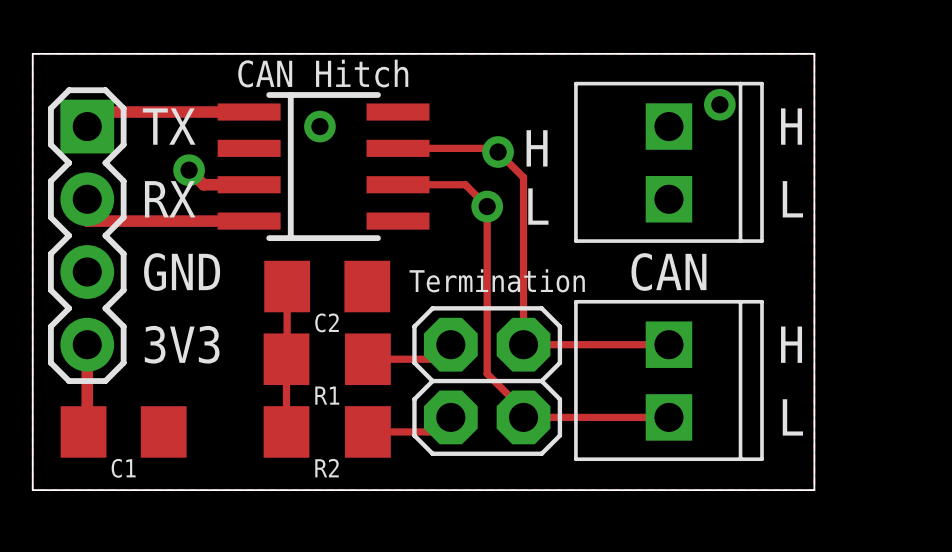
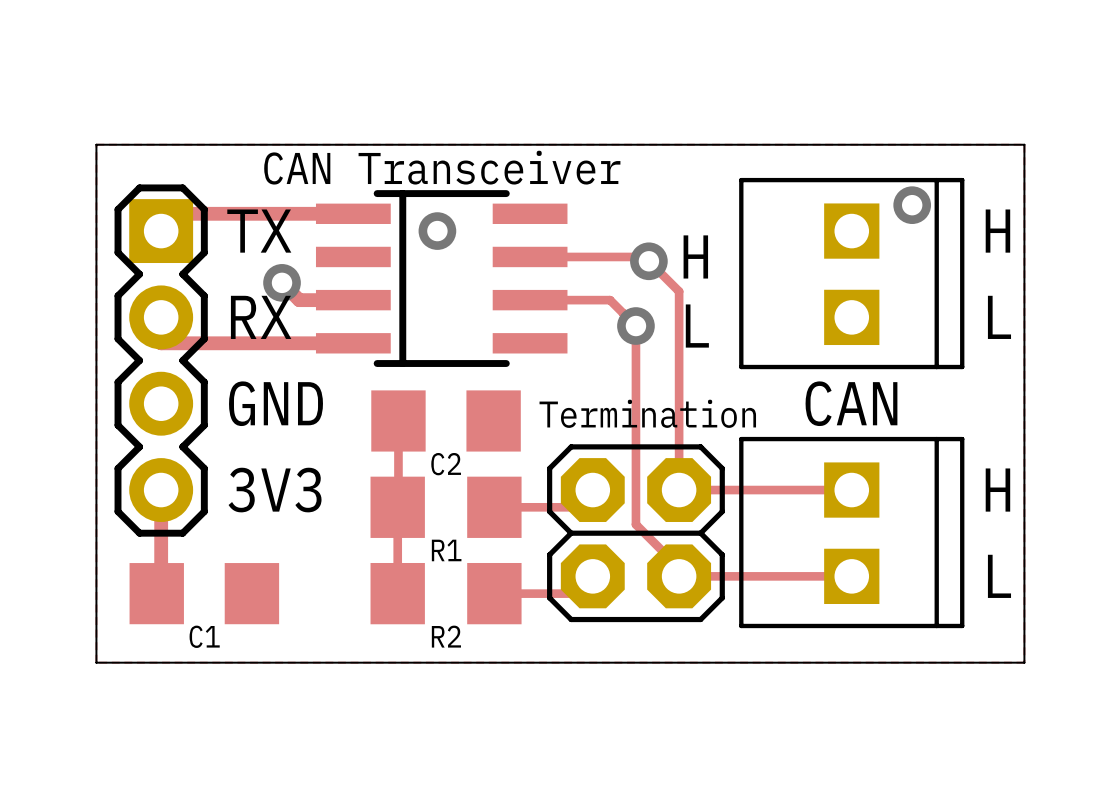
text: CAN Hitch (323, 73) -> CAN Transceiver (442, 167)

